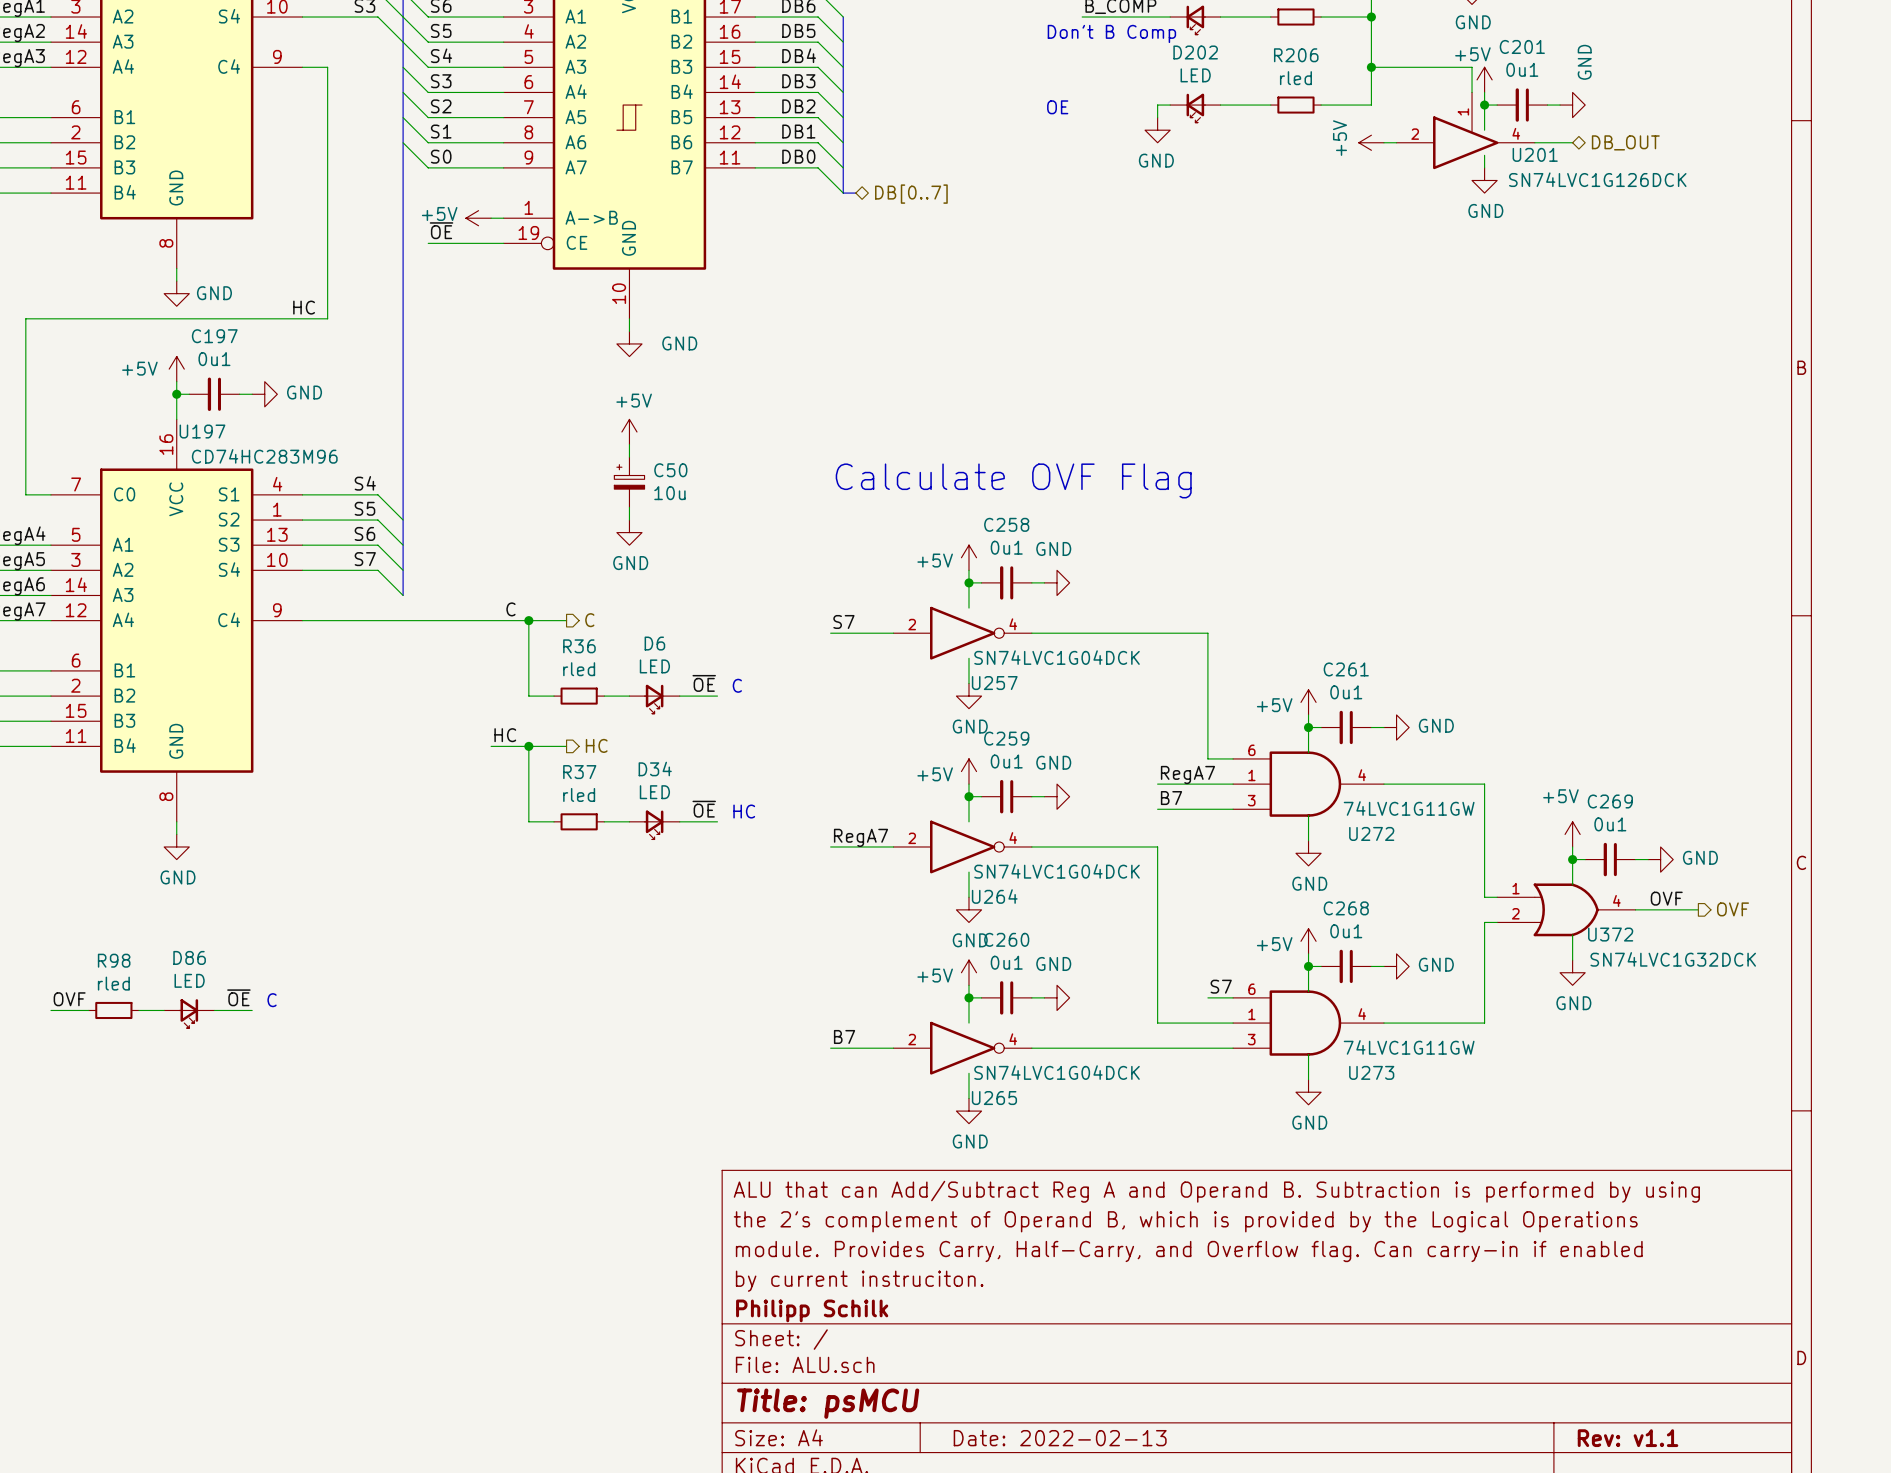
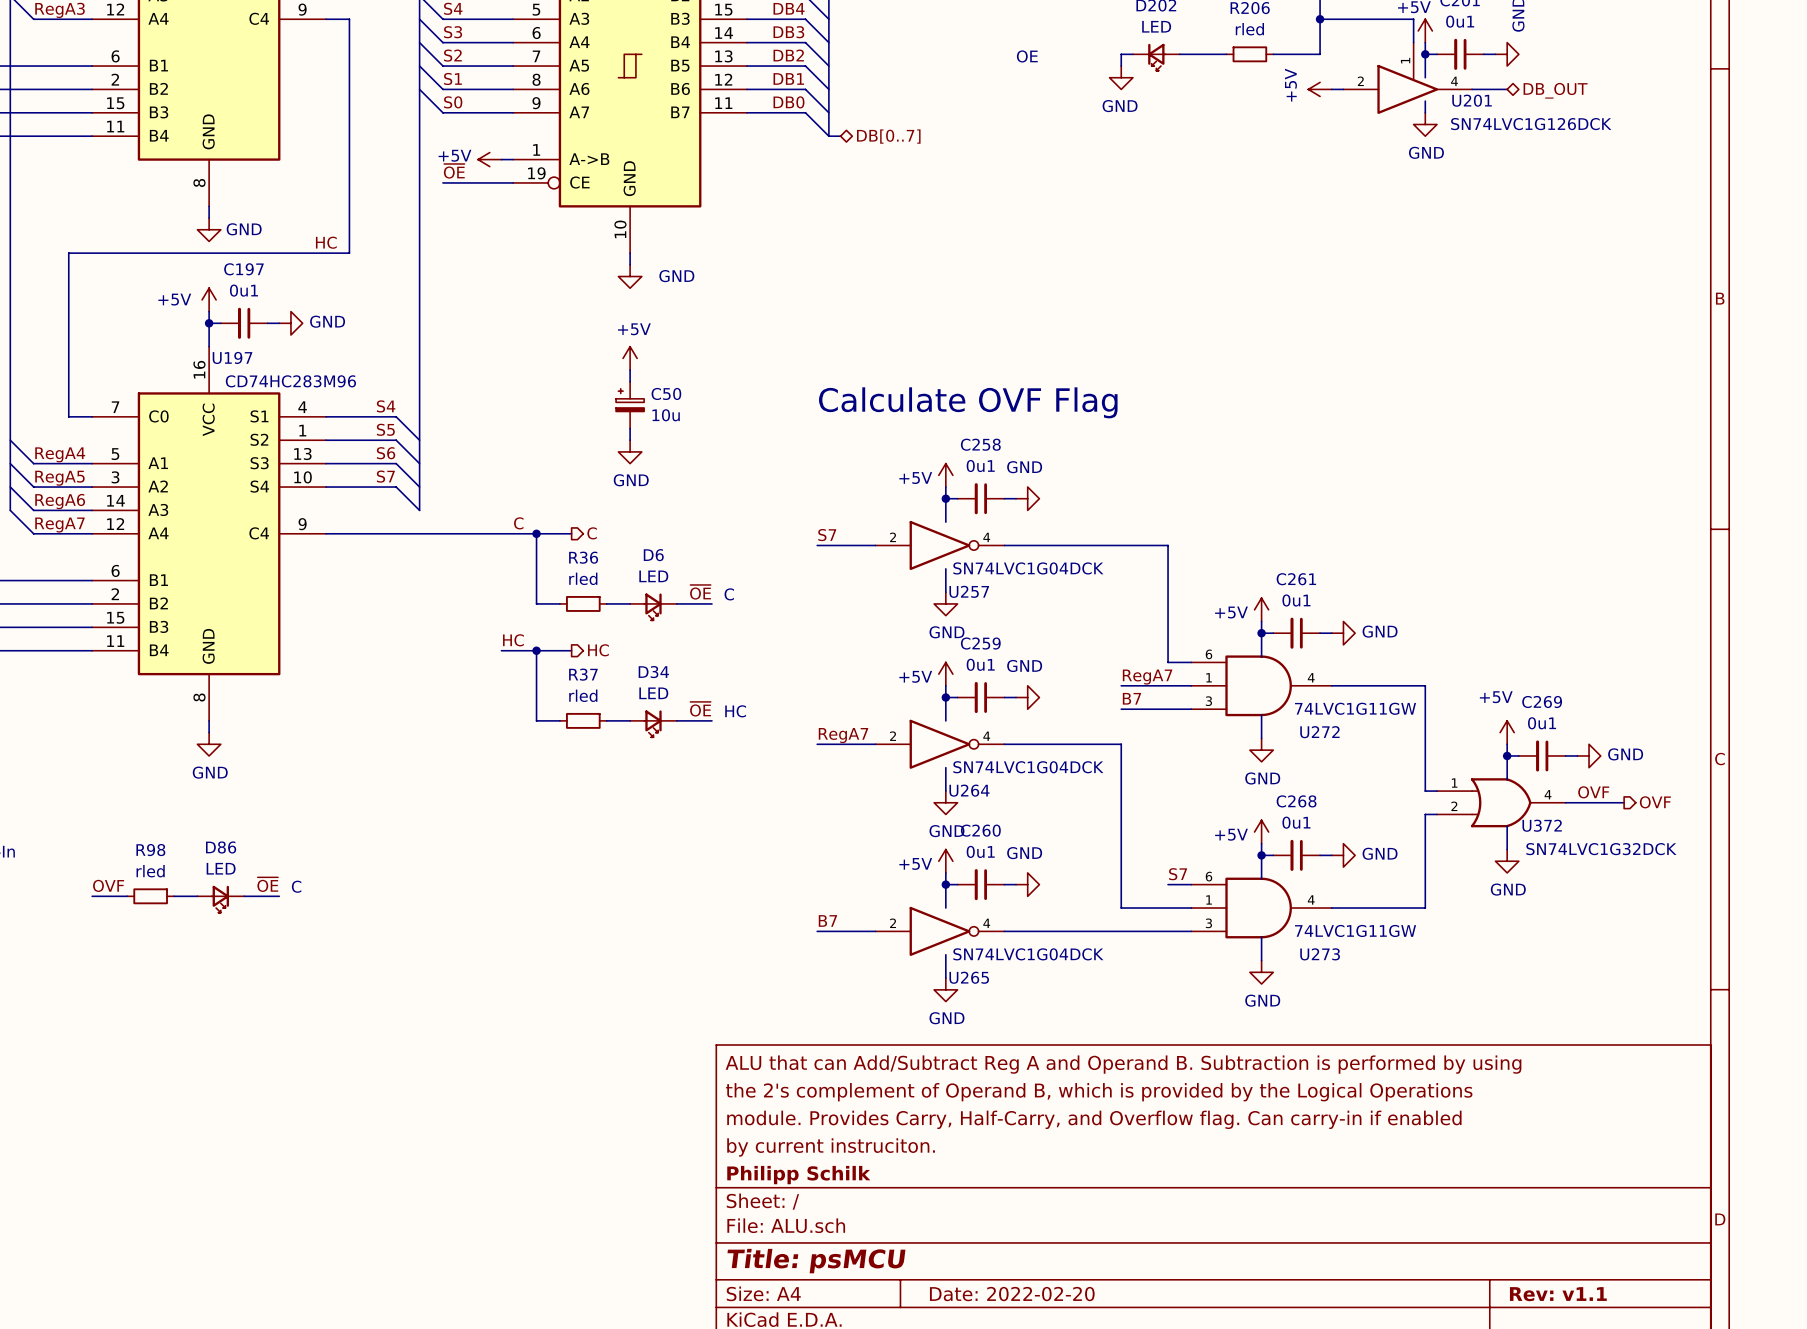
title block: Date: 2022-02-13 (1060, 1438) -> Date: 2022-02-20 (1012, 1294)

